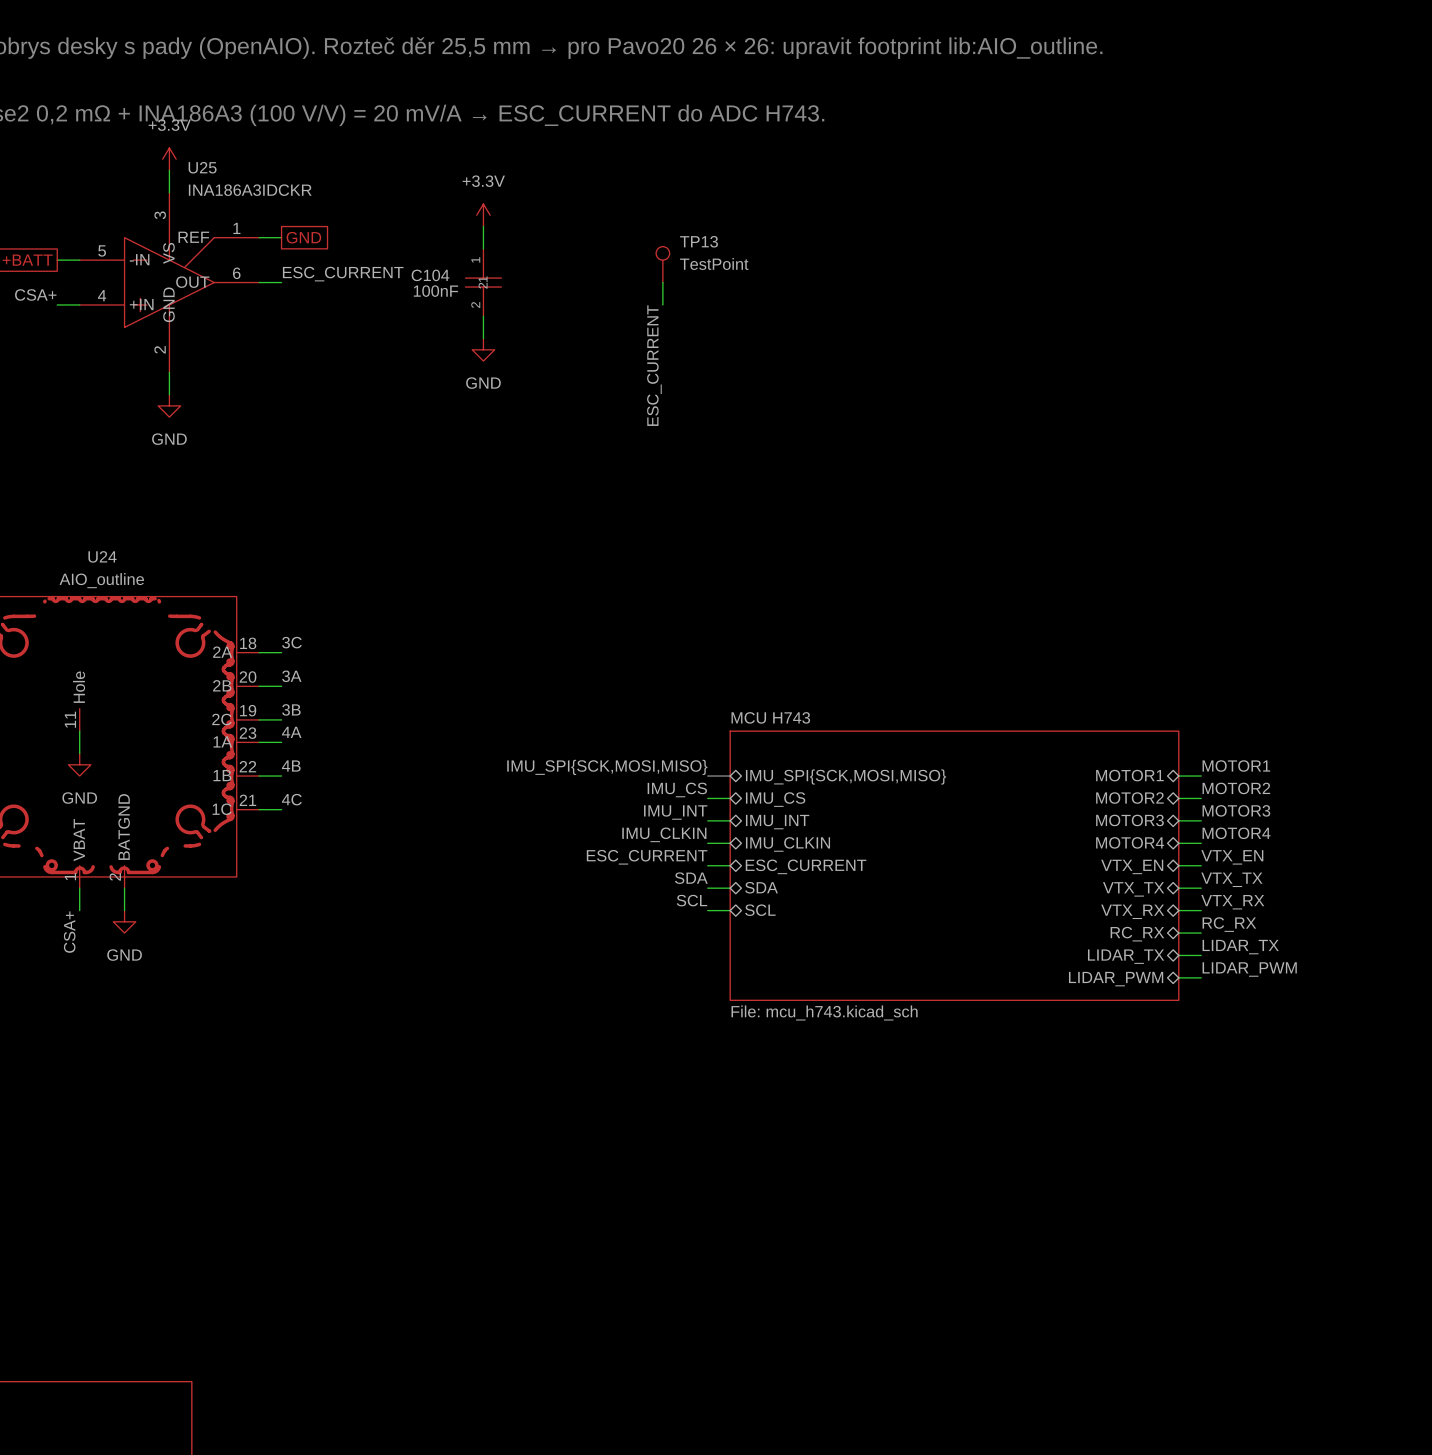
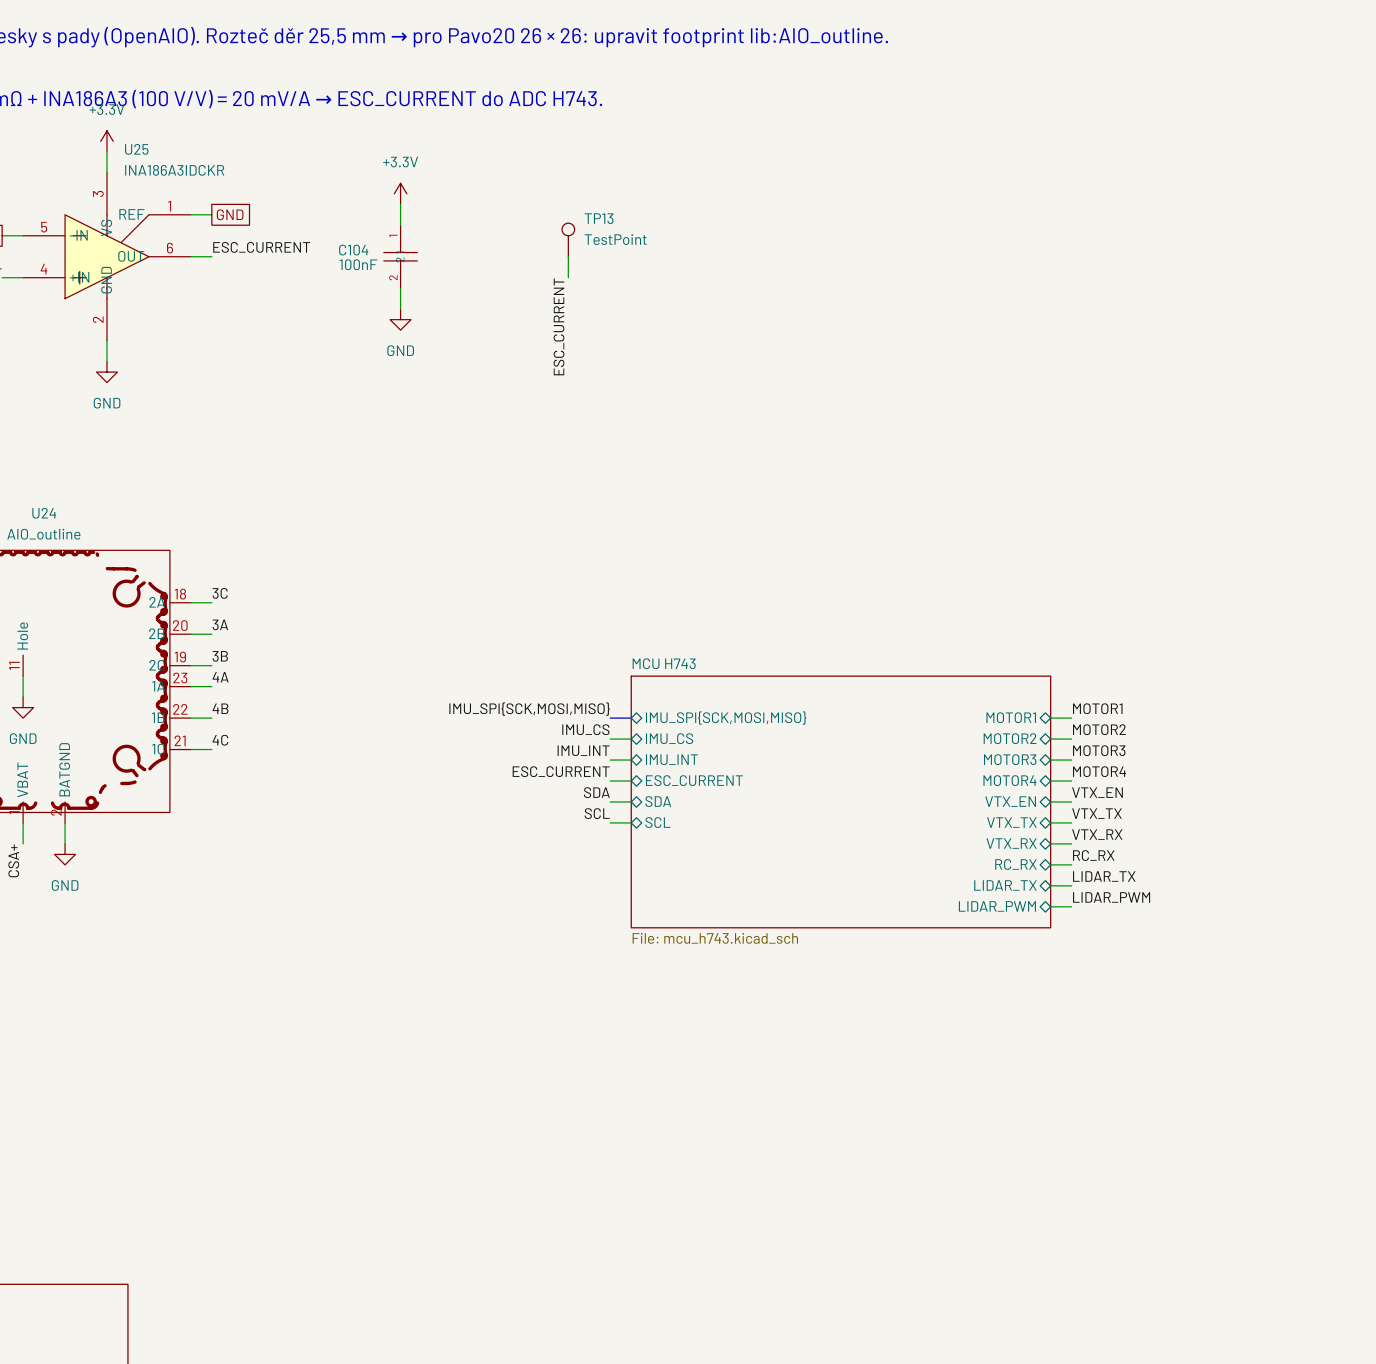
label: IMU_CLKIN (664, 834) -> ESC_CURRENT (561, 771)
sheet pin: IMU_CLKIN (787, 844) -> ESC_CURRENT (694, 780)
label: ESC_CURRENT (647, 857) -> SDA (596, 792)
sheet pin: ESC_CURRENT (806, 866) -> SDA (658, 801)
label: SDA (691, 878) -> SCL (597, 813)
sheet pin: SDA (761, 887) -> SCL (657, 822)
label: SCL (691, 900) -> none
wire: (707, 910) (730, 910) -> none
sheet pin: SCL (760, 910) -> none

